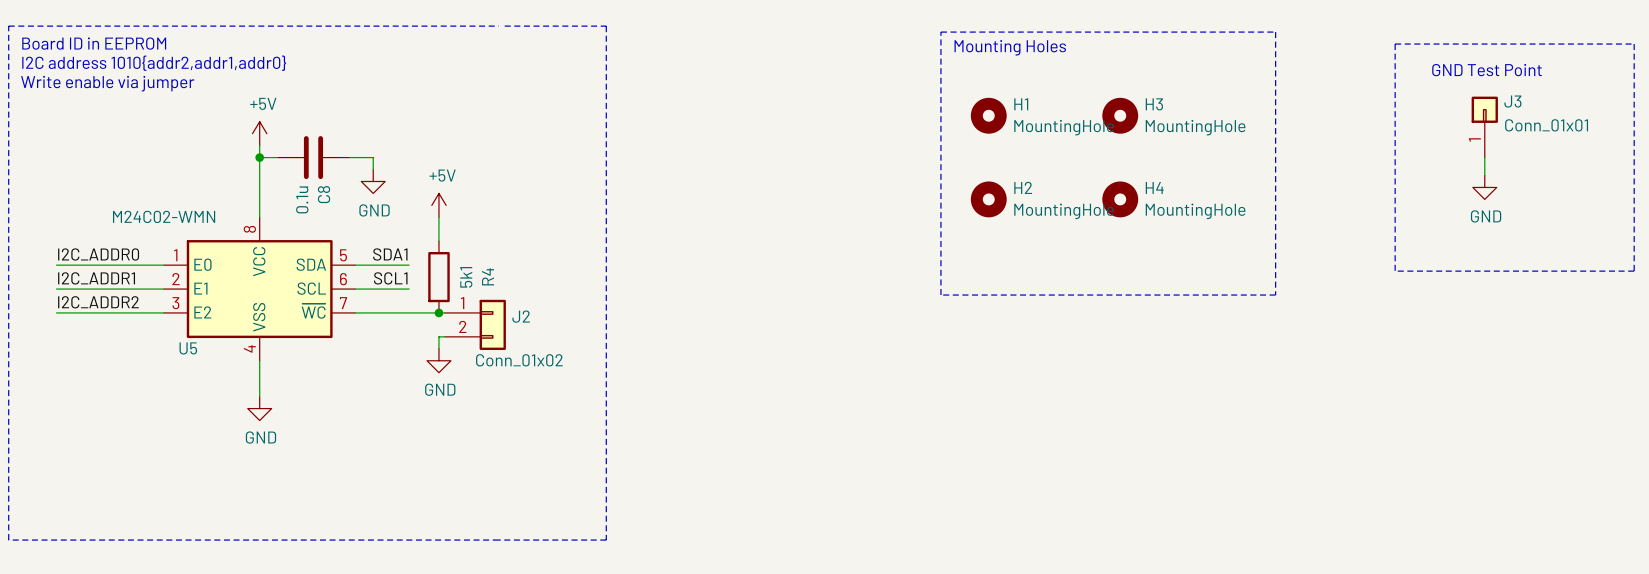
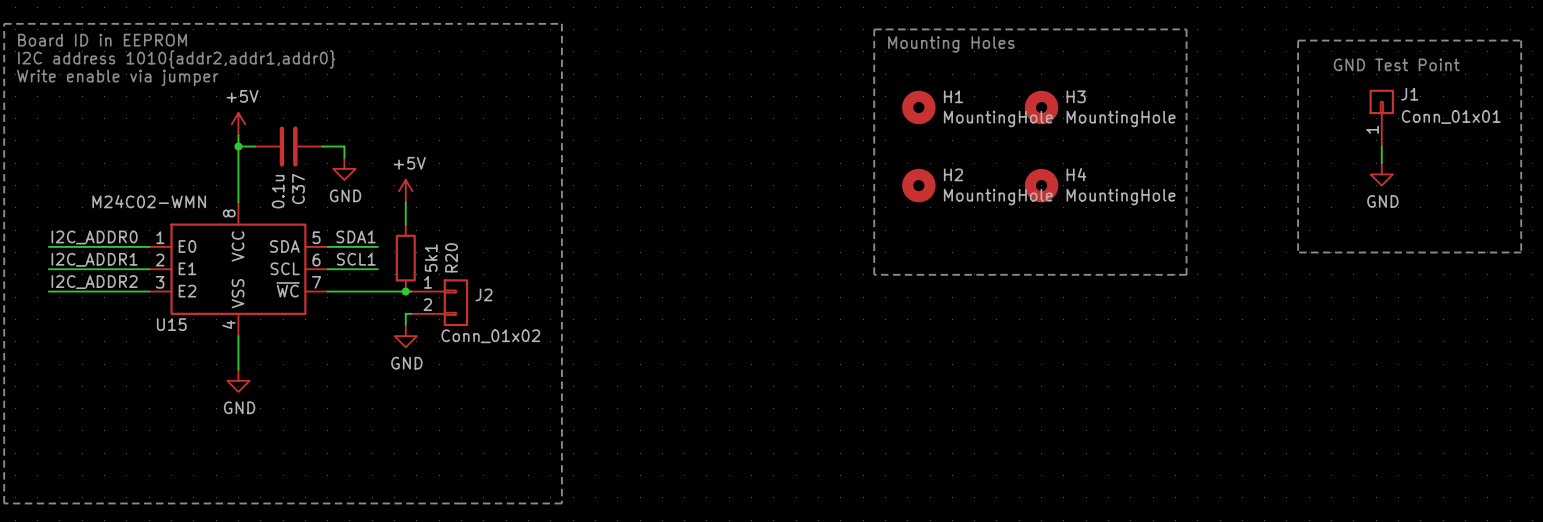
J3 name: J3 (1512, 101) -> J1 (1409, 94)
C8 name: C8 (324, 194) -> C37 (298, 189)
R4 name: R4 (488, 276) -> R20 (451, 257)
U5 name: U5 (188, 348) -> U15 (171, 324)

